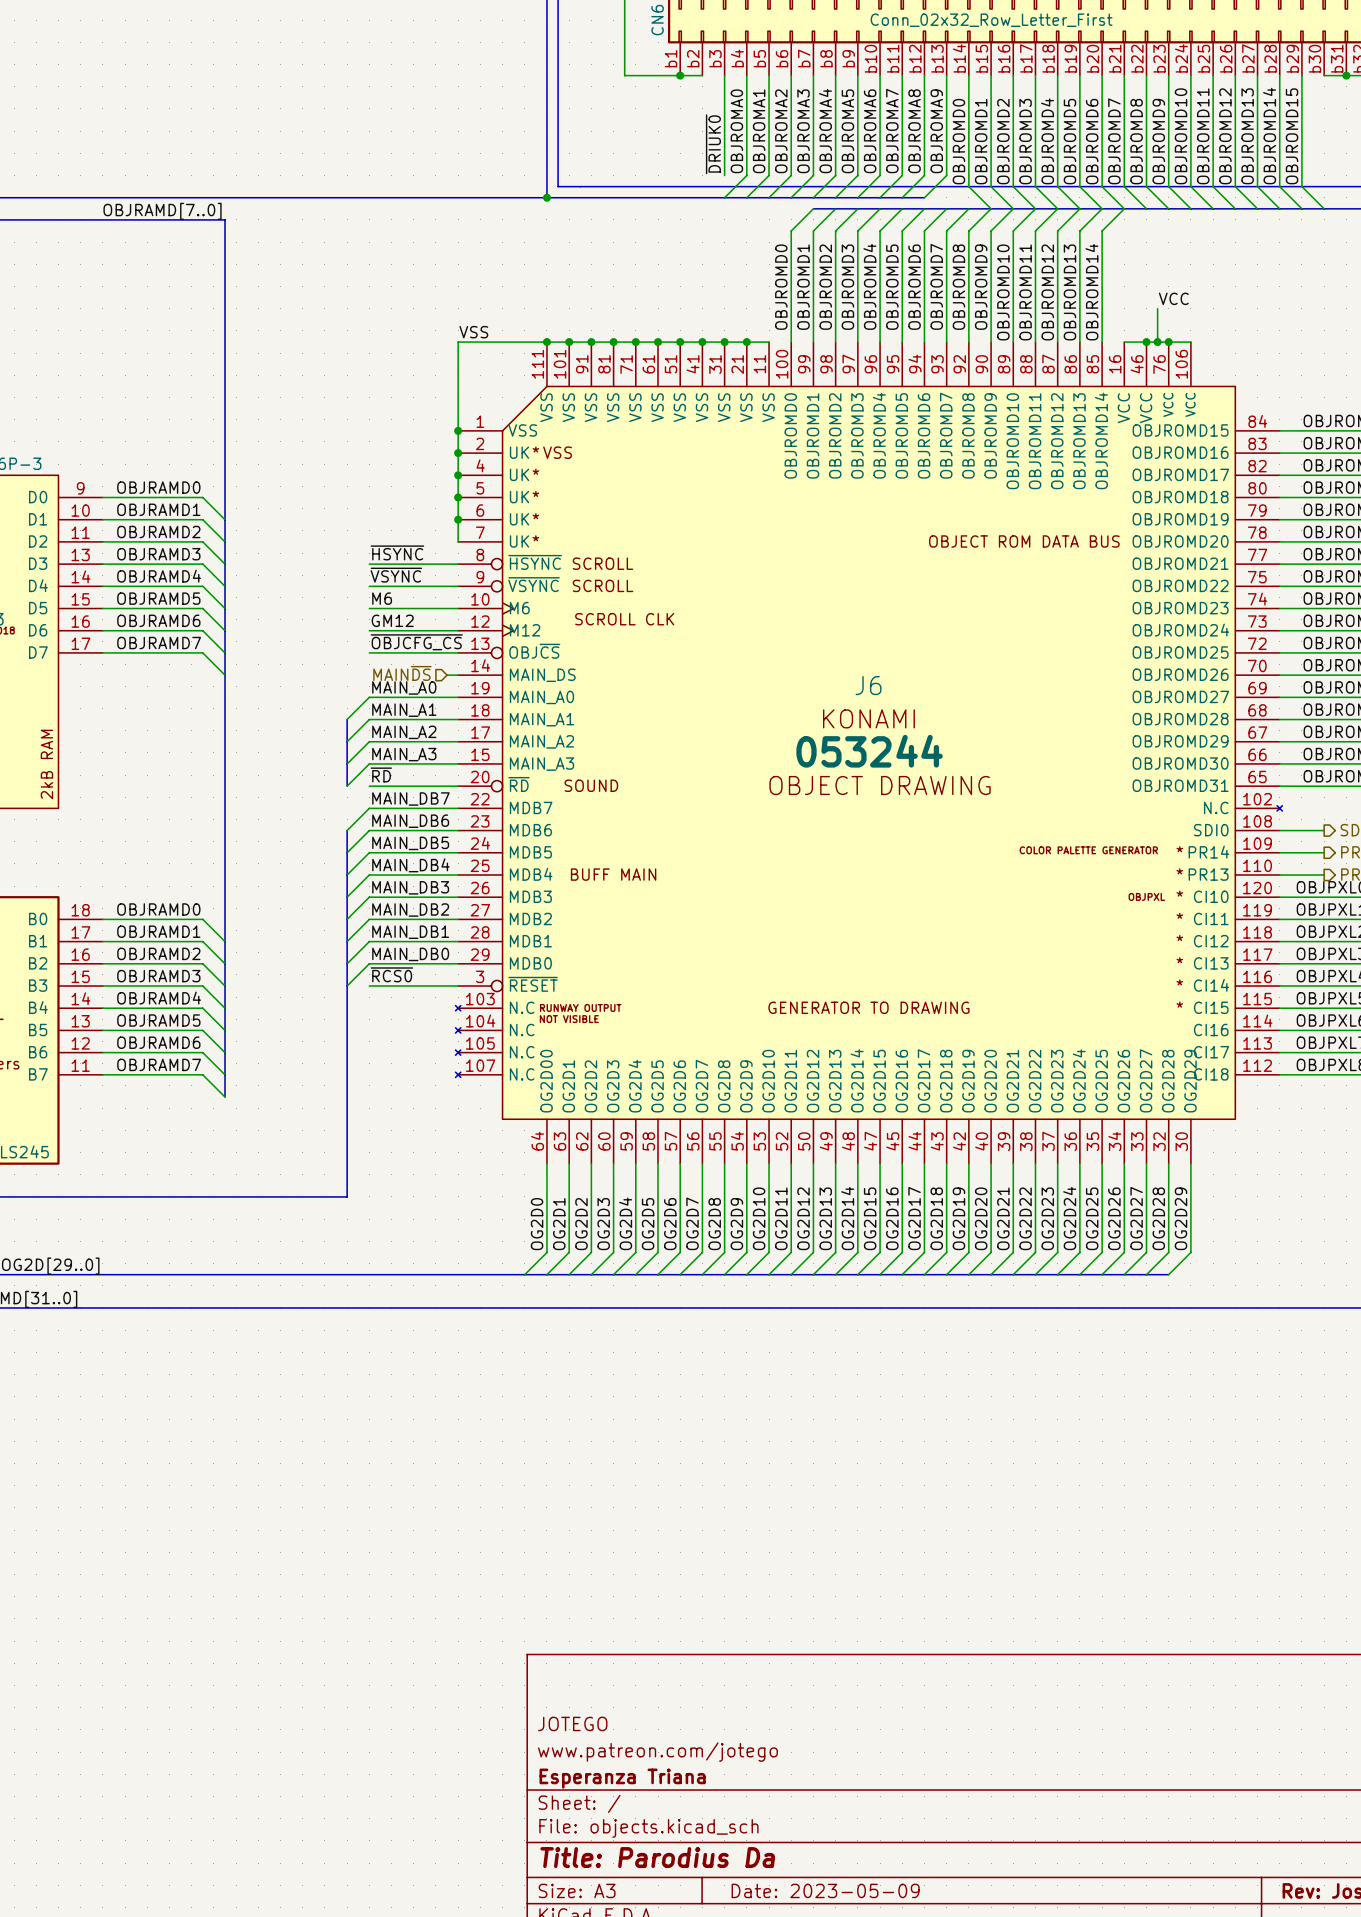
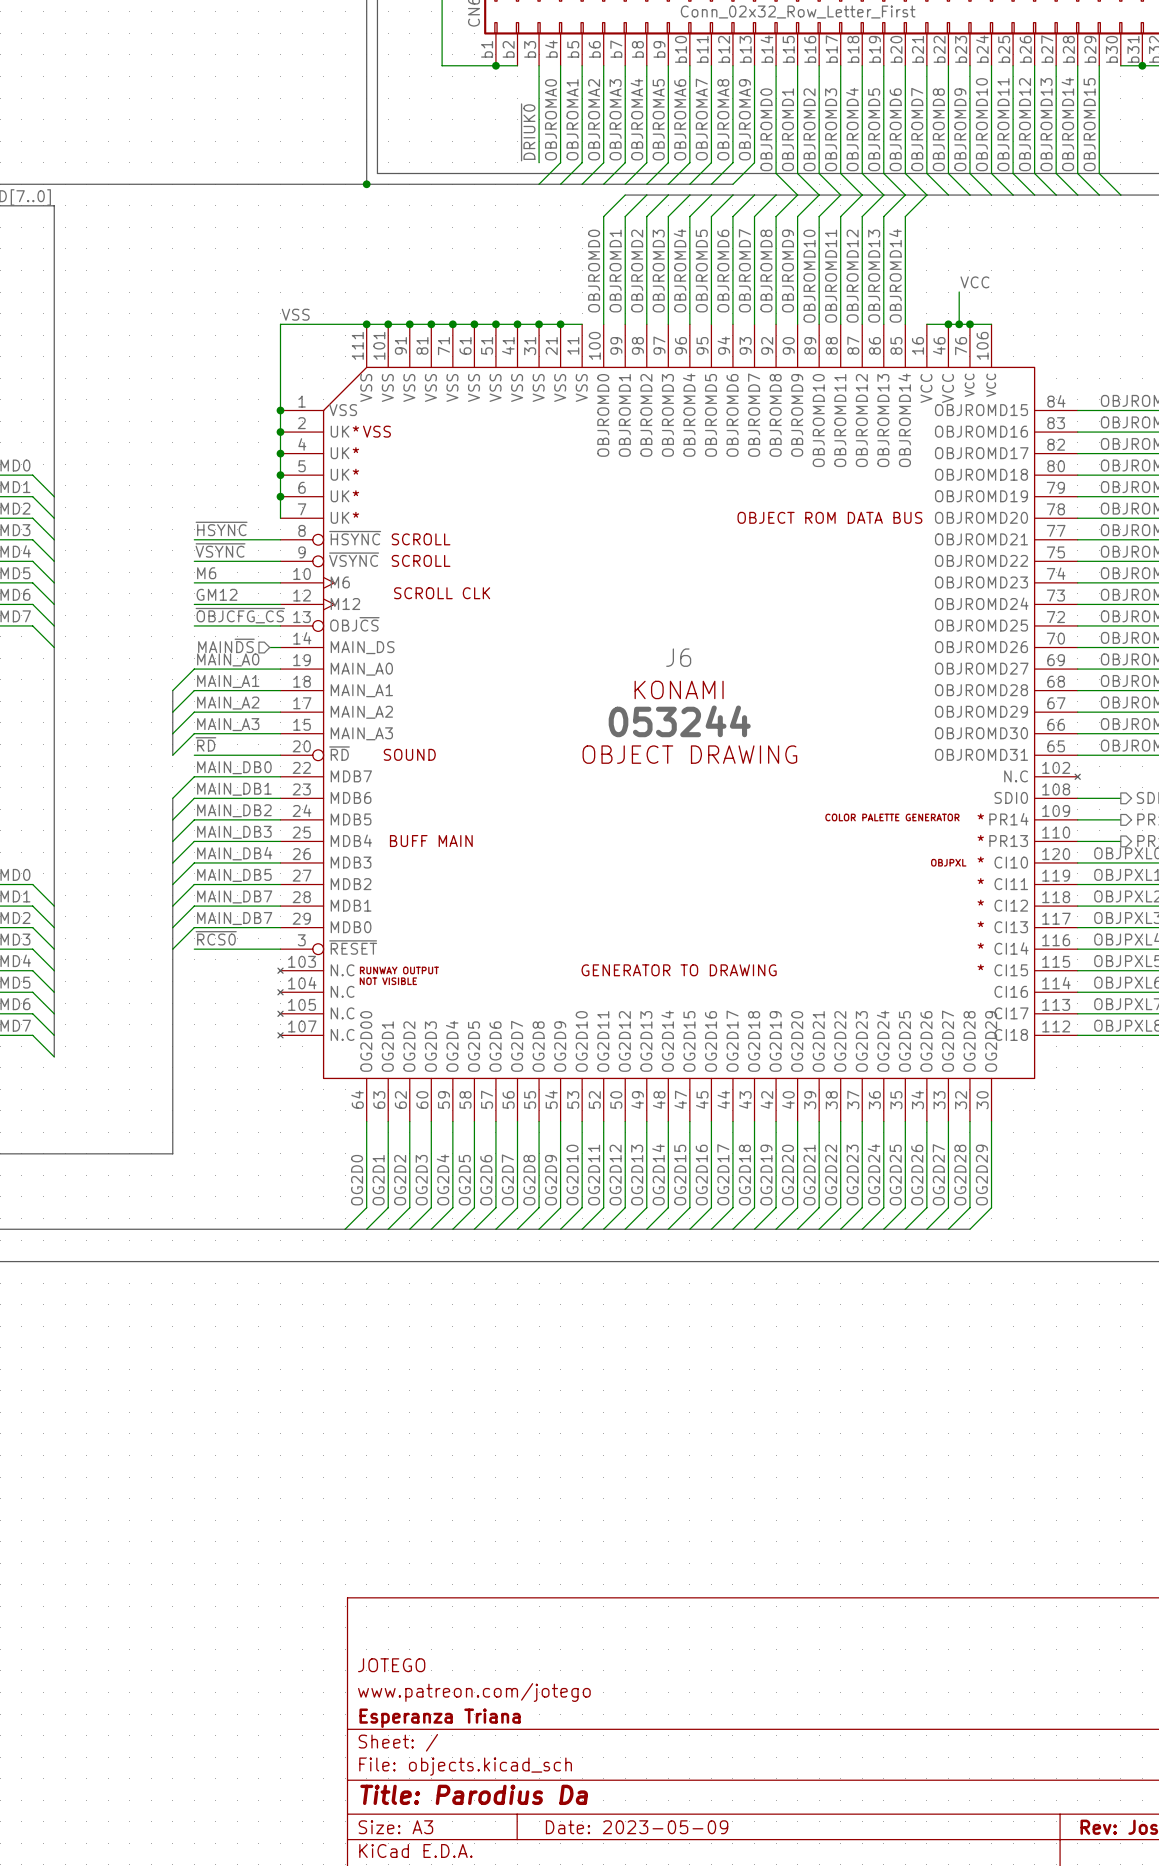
label: MAIN_DB7 (410, 798) -> MAIN_DB0 (234, 767)
label: MAIN_DB6 (410, 821) -> MAIN_DB1 (234, 789)
label: MAIN_DB5 (410, 843) -> MAIN_DB2 (234, 810)
label: MAIN_DB4 (410, 865) -> MAIN_DB3 (234, 832)
label: MAIN_DB3 (410, 887) -> MAIN_DB4 (234, 853)
label: MAIN_DB2 (410, 910) -> MAIN_DB5 (234, 875)
label: MAIN_DB1 (410, 932) -> MAIN_DB7 (234, 896)
label: MAIN_DB0 (410, 954) -> MAIN_DB7 (234, 918)

